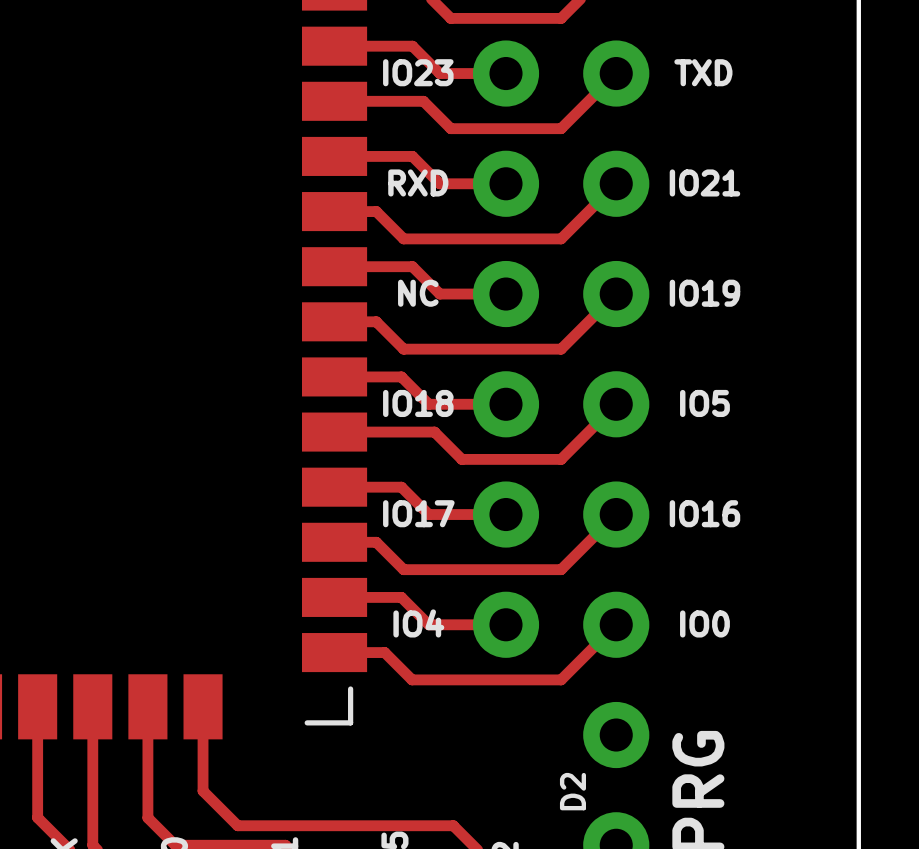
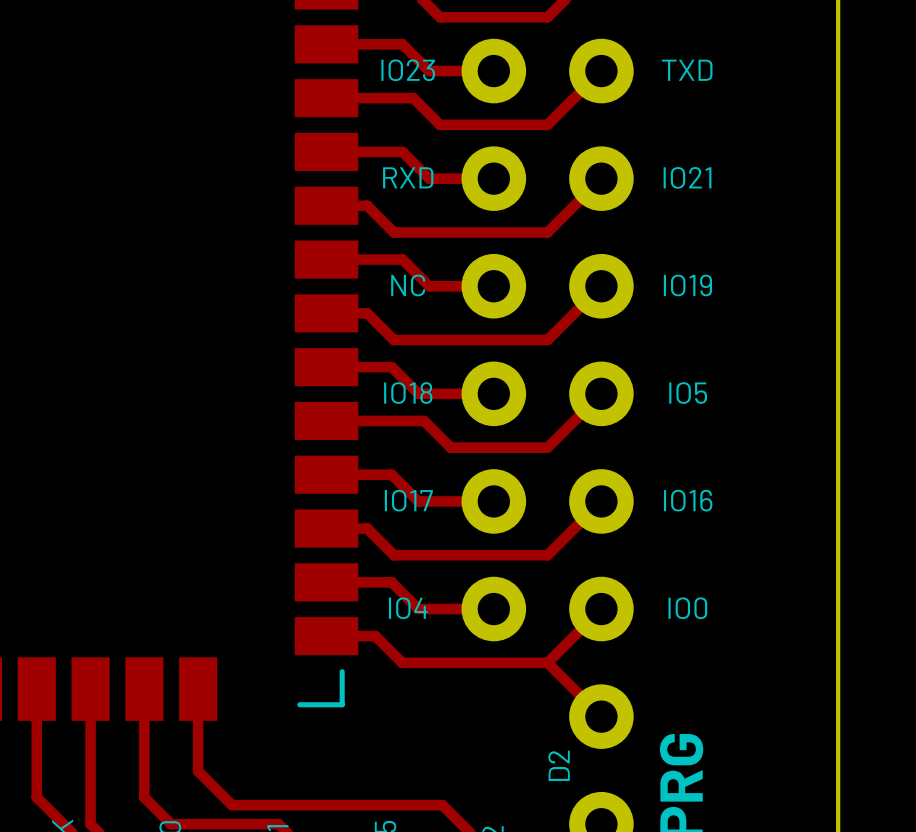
track: none -> (547, 662) (601, 716)

